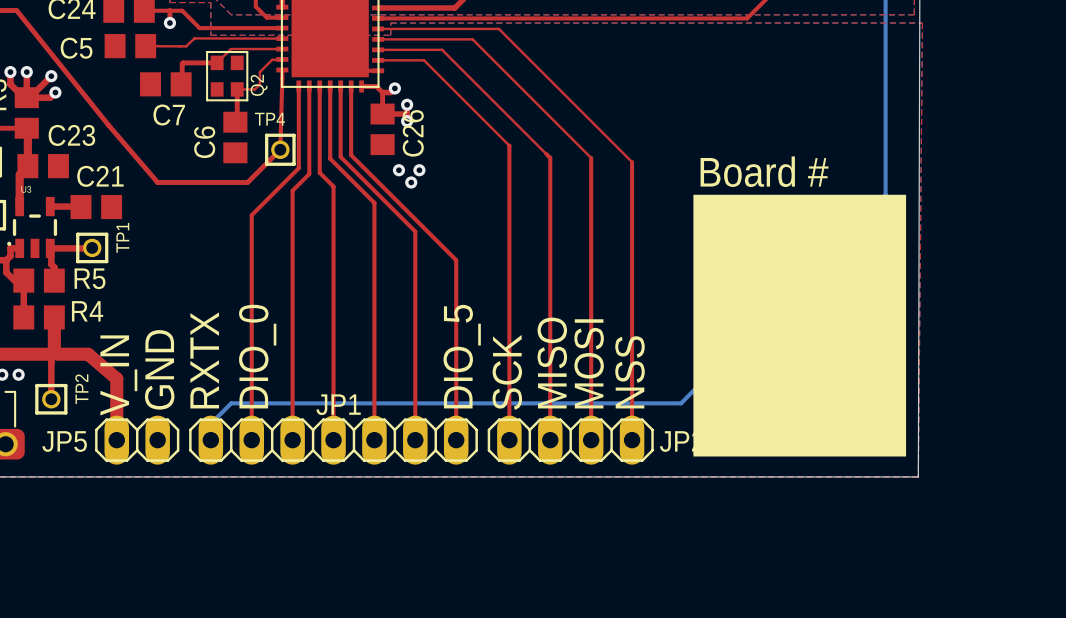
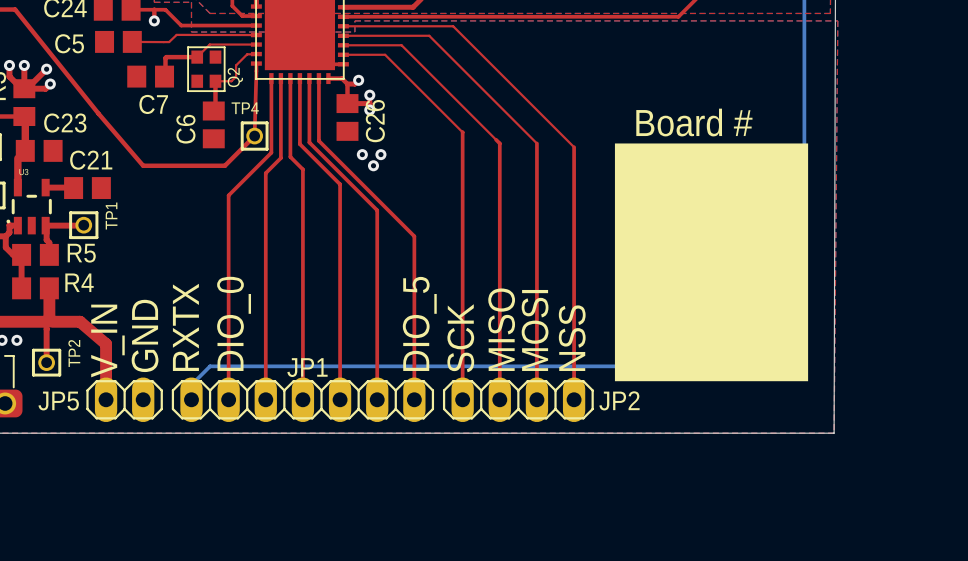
text position: Board # (764, 171) -> Board # (694, 122)
drawing position: (799, 325) -> (711, 262)

